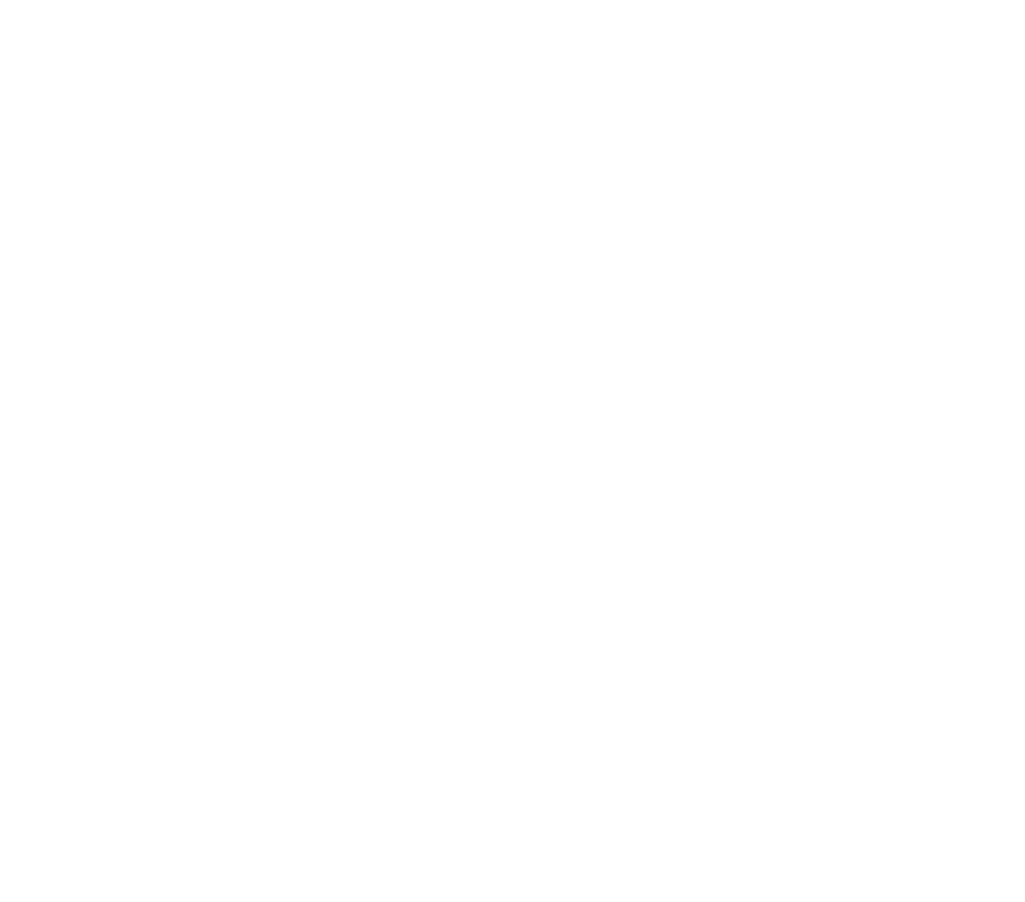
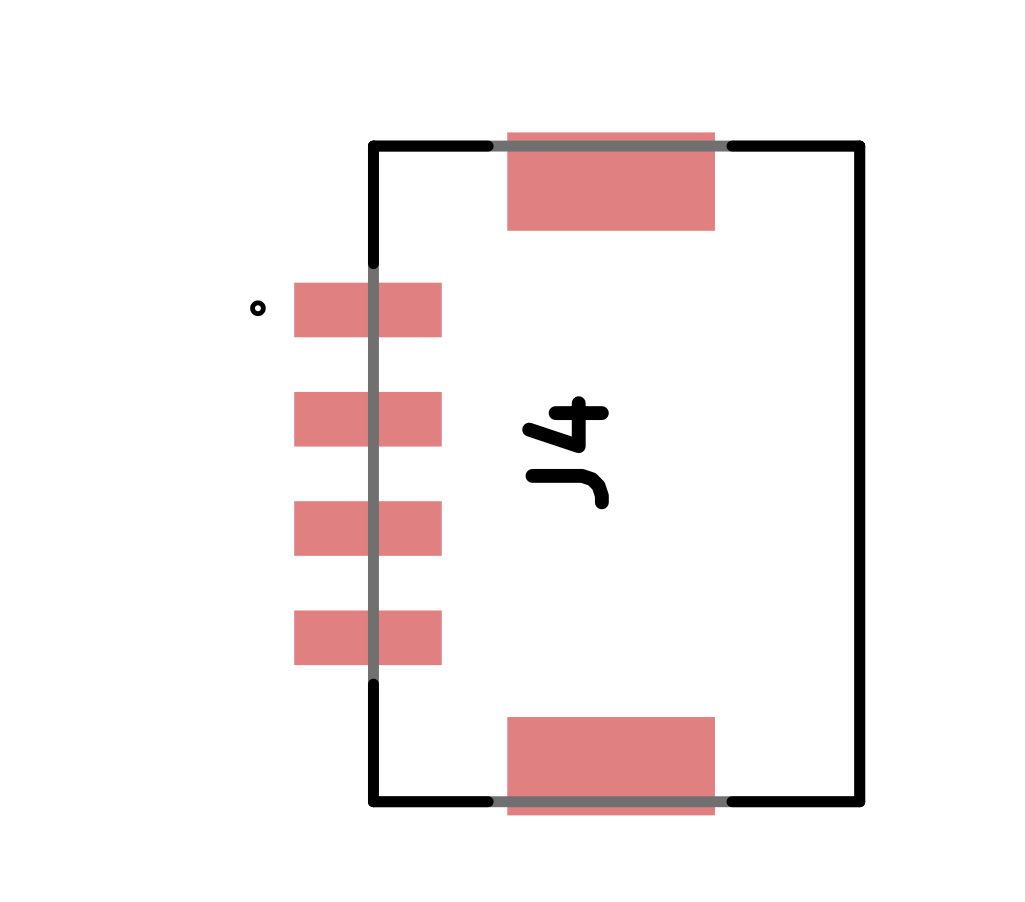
J4: none -> (557, 473)

